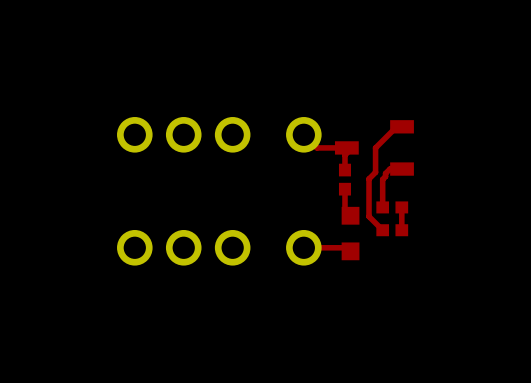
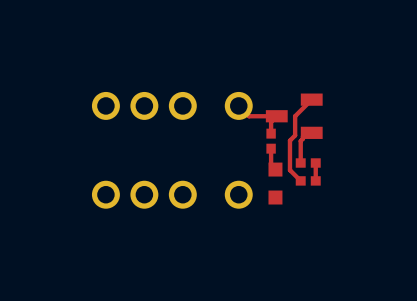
part footprint: [334, 120, 414, 176] -> [265, 93, 323, 139]
top track: (303, 247) (346, 247) (350, 251) -> none

